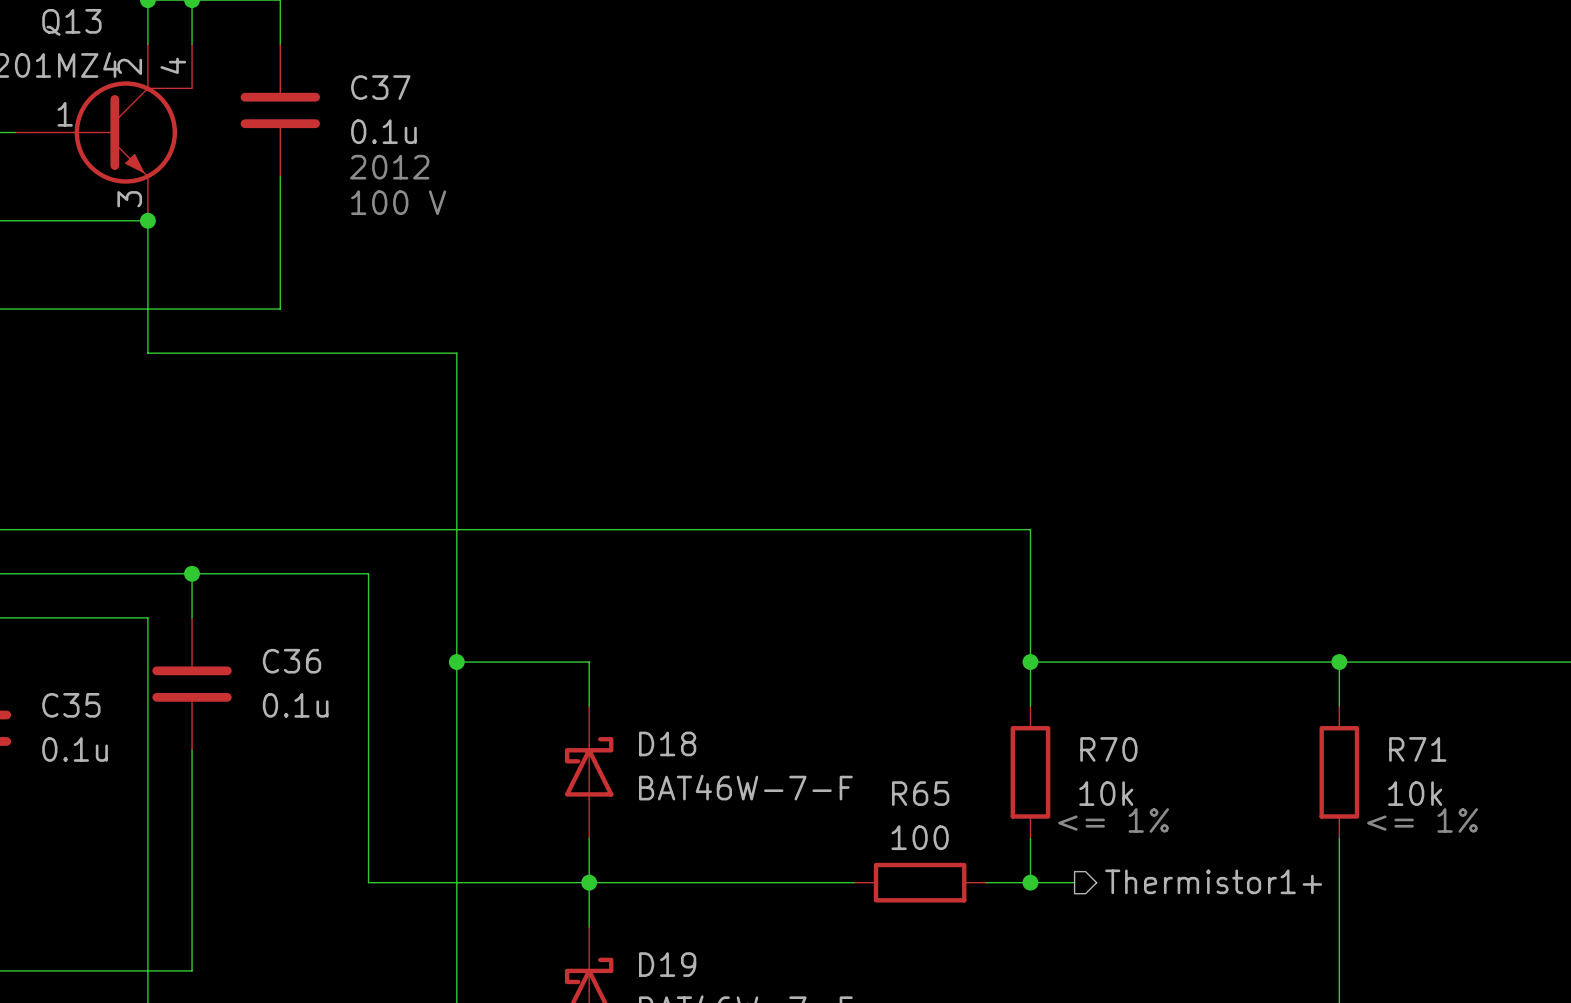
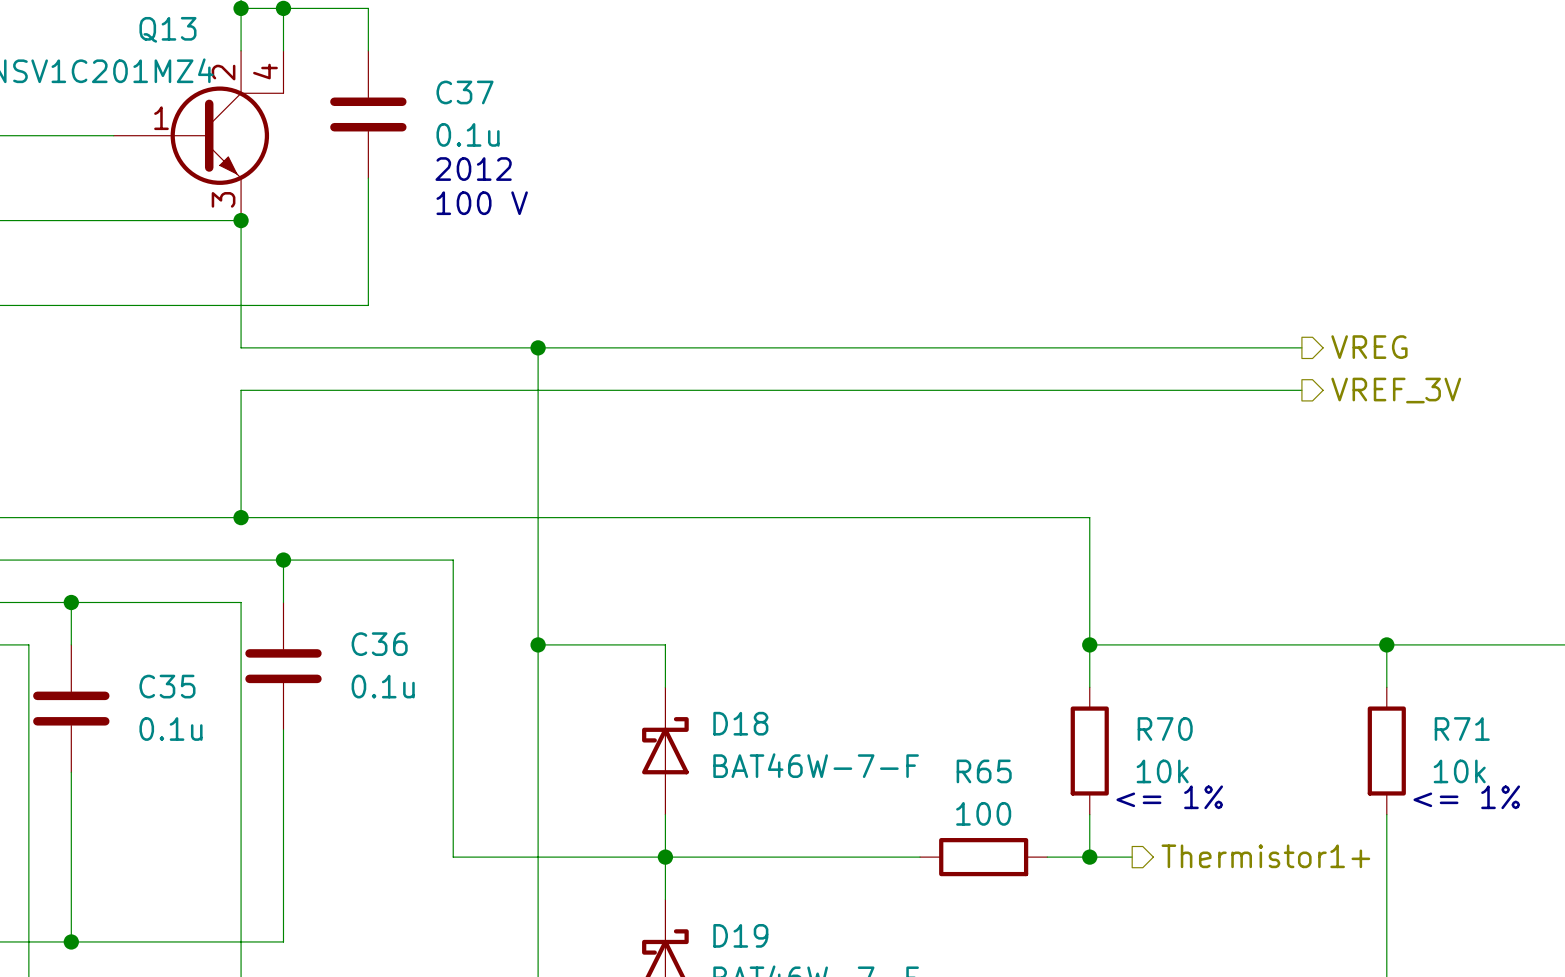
hierarchical label: none -> VREG (1369, 347)
wire: none -> (538, 347) (1301, 347)
junction: none -> (538, 347)
wire: none -> (1301, 390) (241, 390) (241, 517)
hierarchical label: none -> VREF_3V (1396, 390)
junction: none -> (241, 517)

